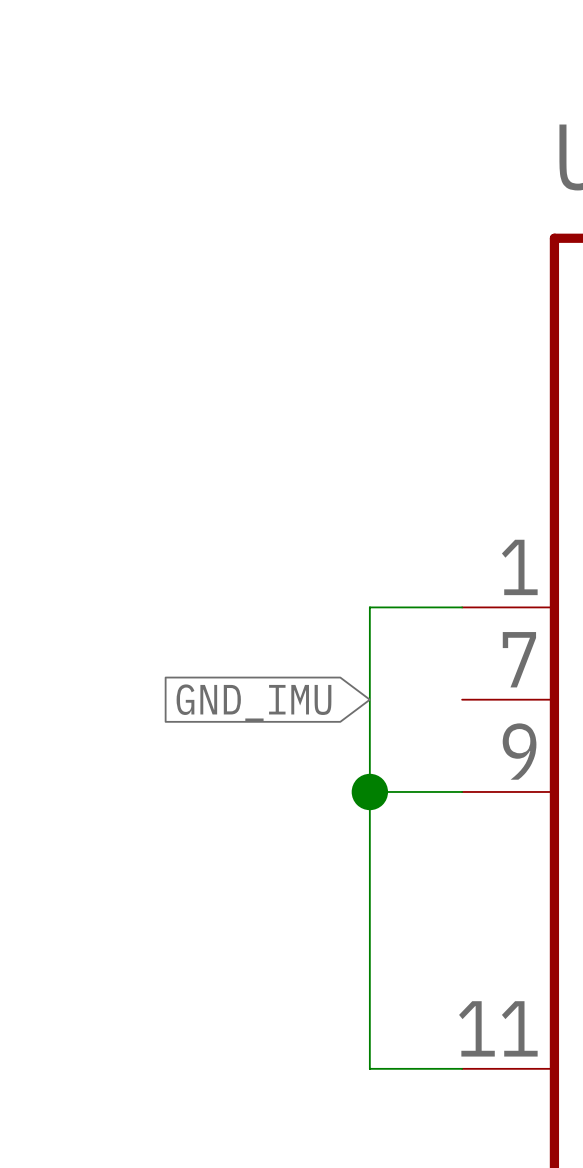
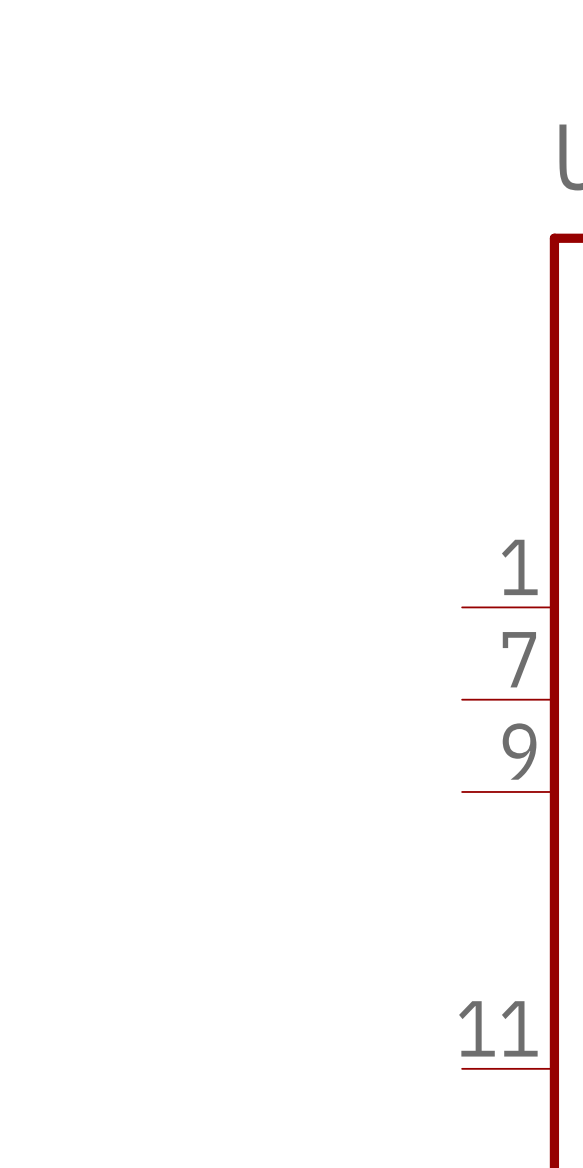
wire: (462, 607) (369, 607) (369, 1068) (462, 1068) -> none
global label: GND_IMU (253, 703) -> none
wire: (369, 791) (462, 791) -> none
junction: (369, 791) -> none

